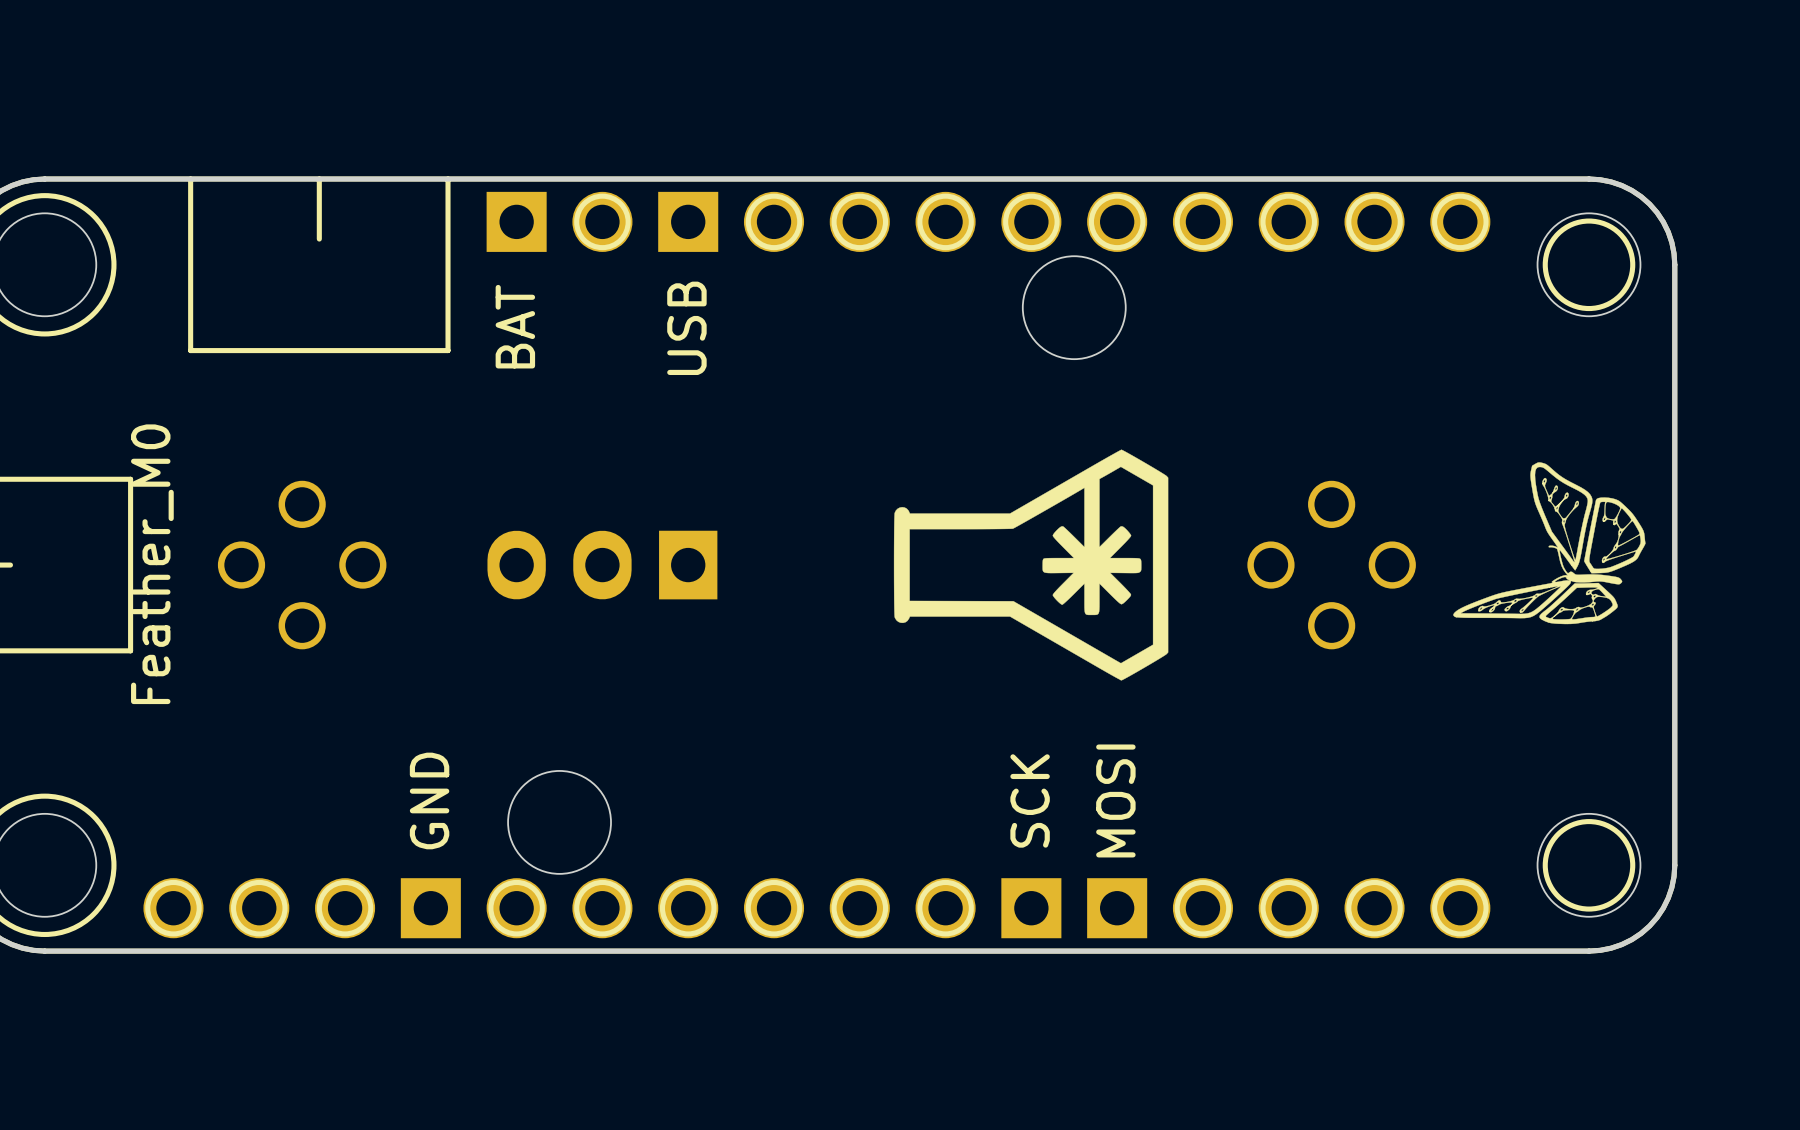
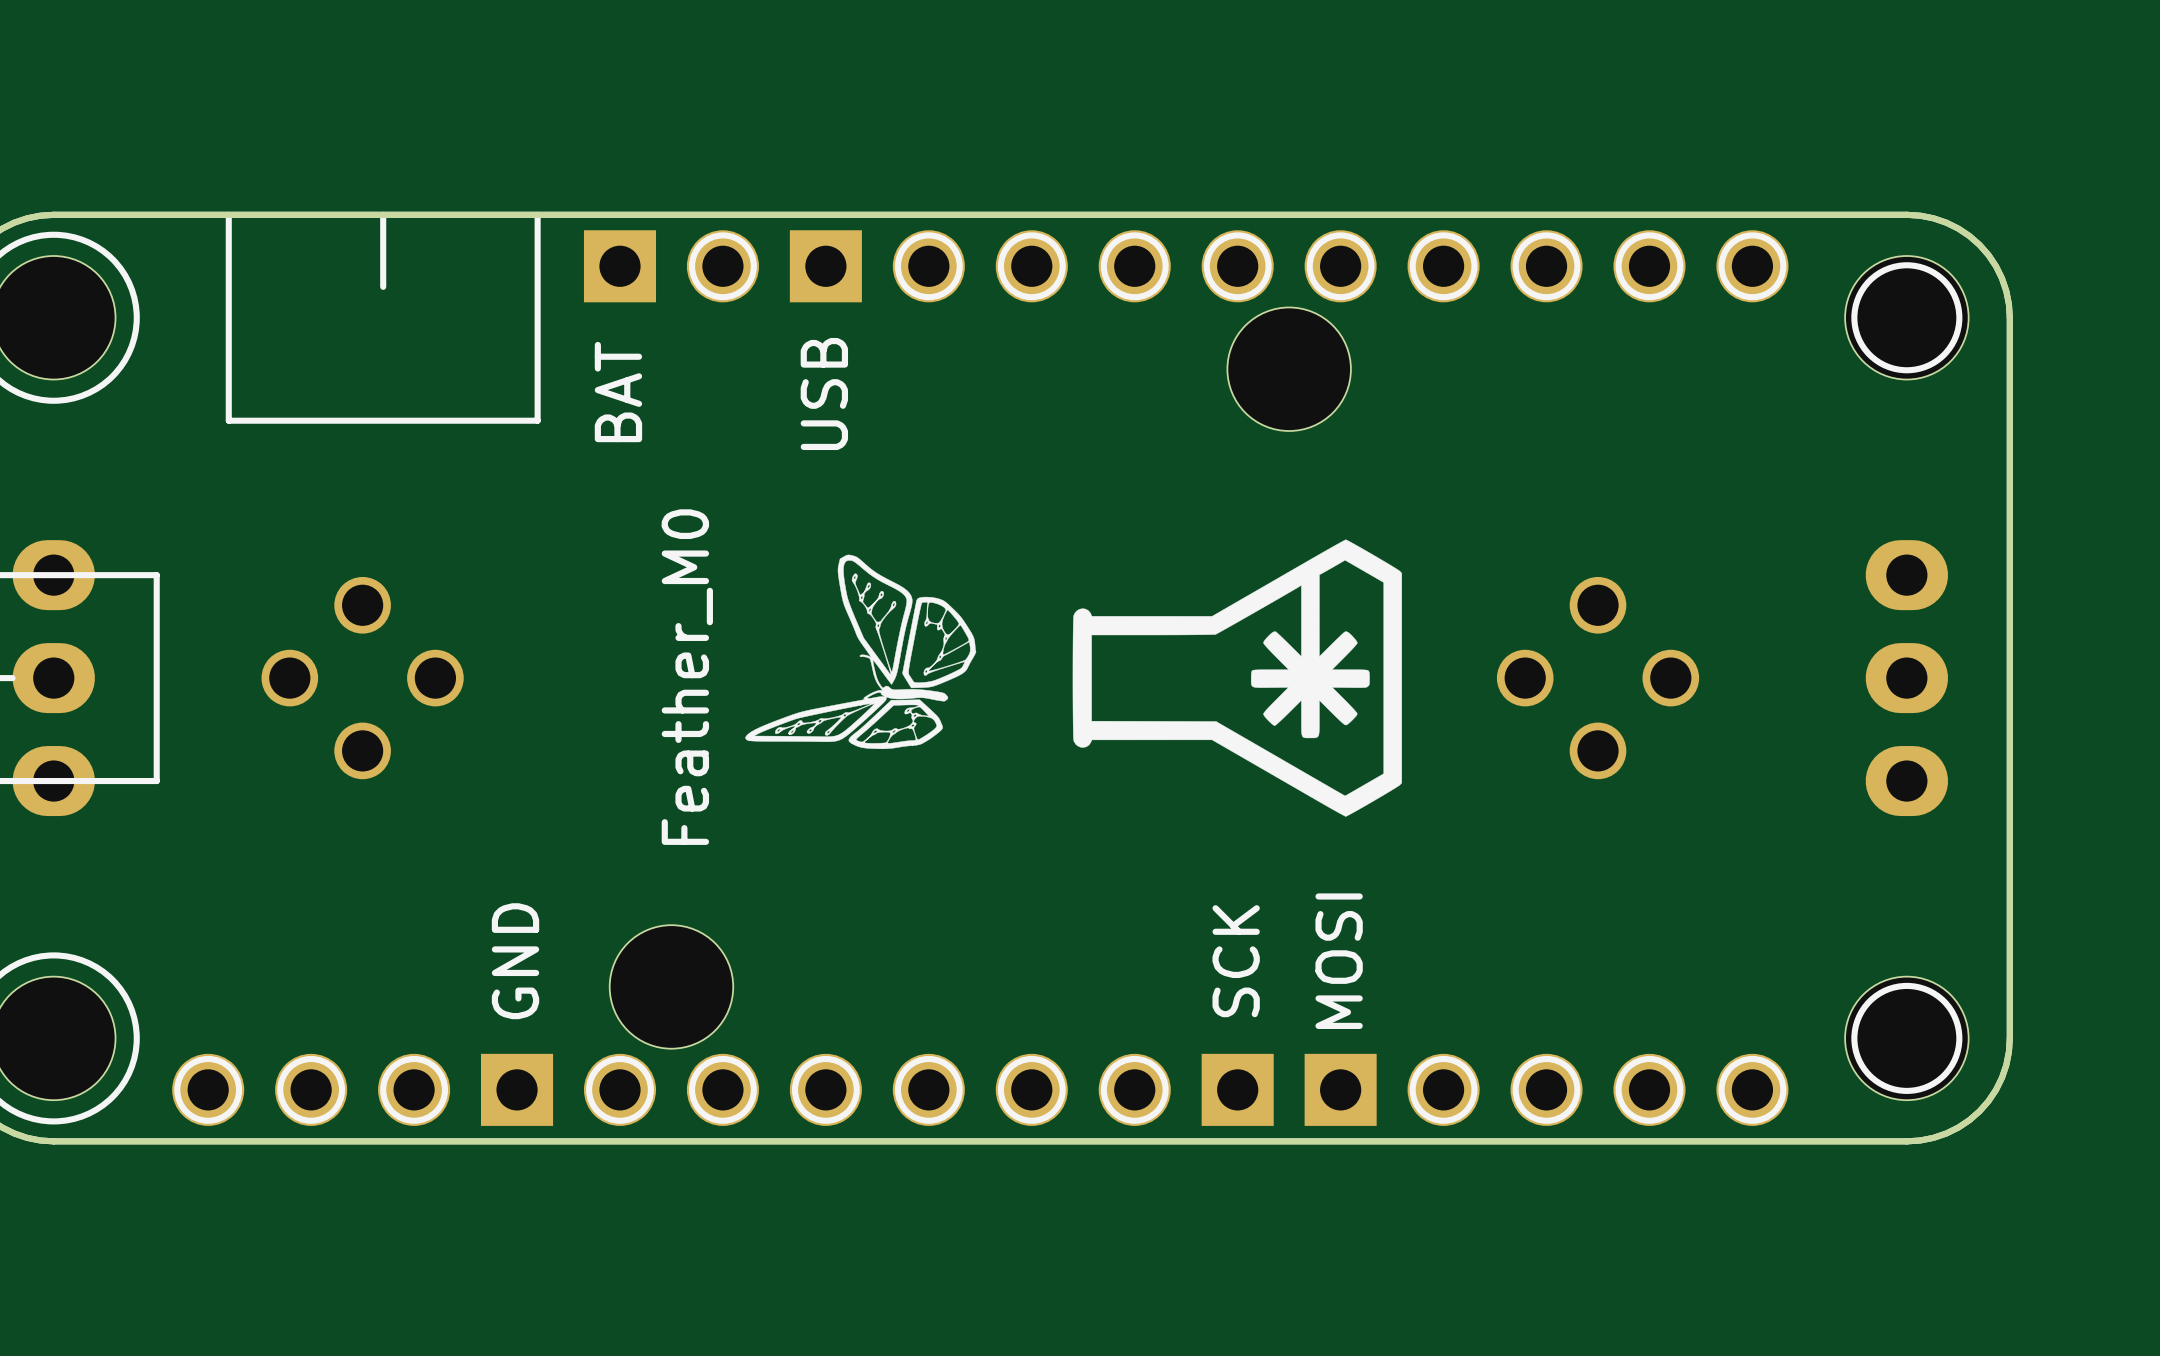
drawing position: (1549, 543) -> (860, 651)
part value position: Feather_M0 (152, 564) -> Feather_M0 (687, 677)
part: none -> (53, 678)
part: (602, 565) -> none
part: none -> (1906, 678)

